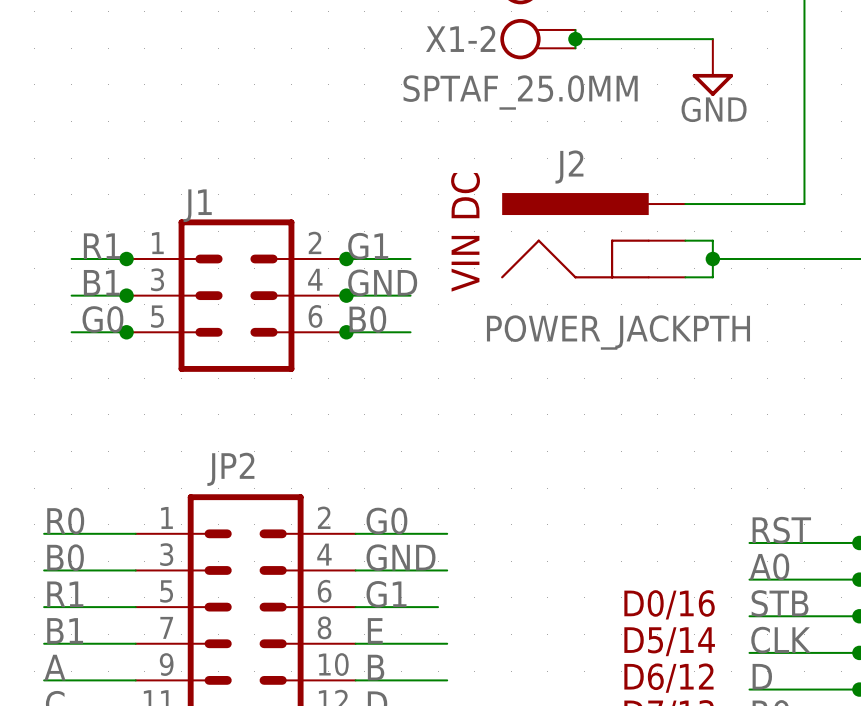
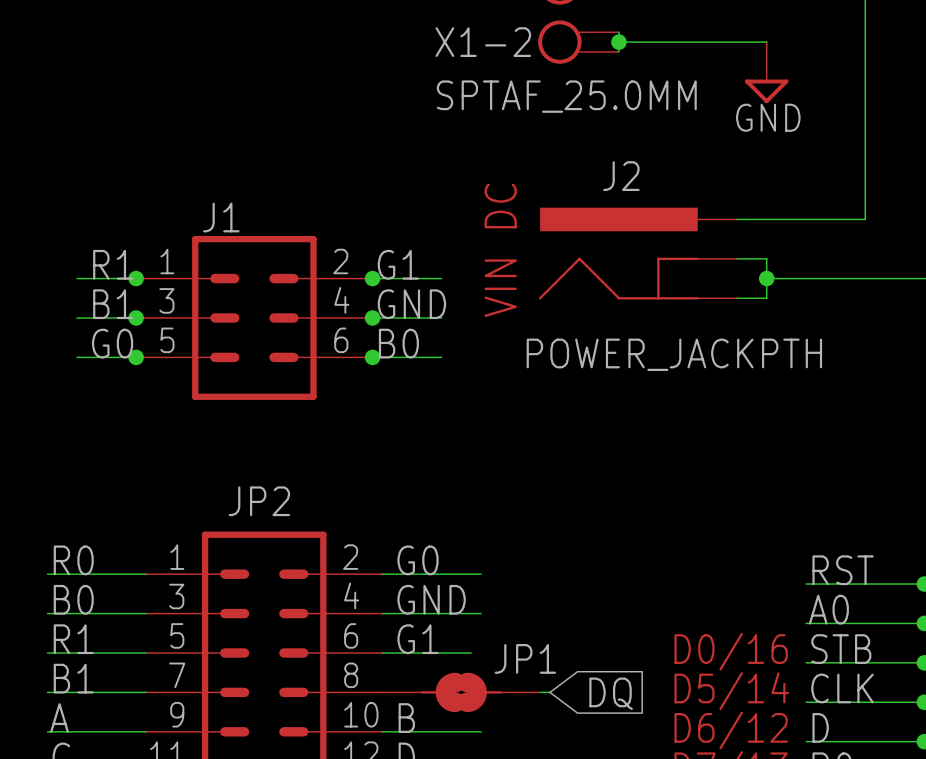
label: E (375, 630) -> none
JP1: none -> (461, 692)
wire: none -> (540, 692) (549, 692)
global label: none -> DQ (611, 693)

